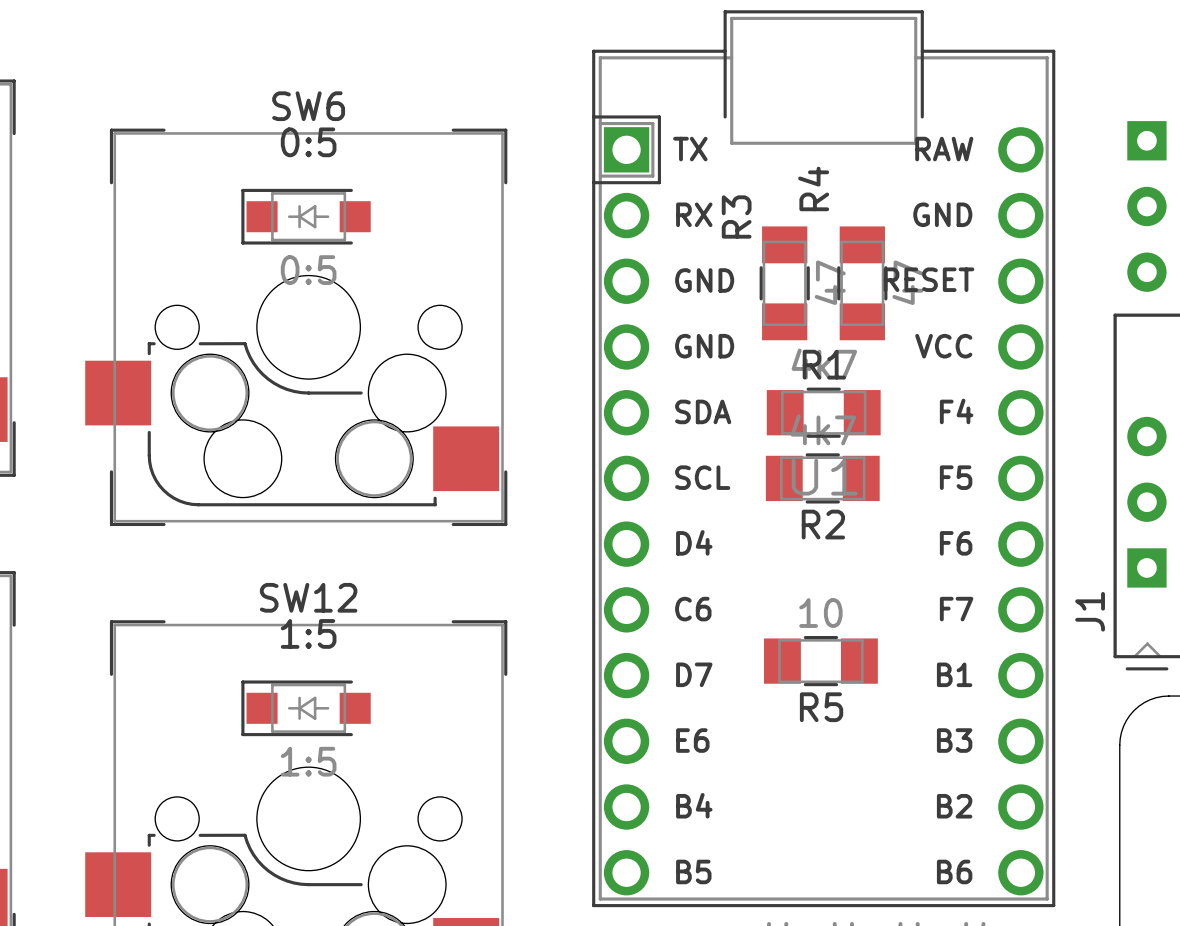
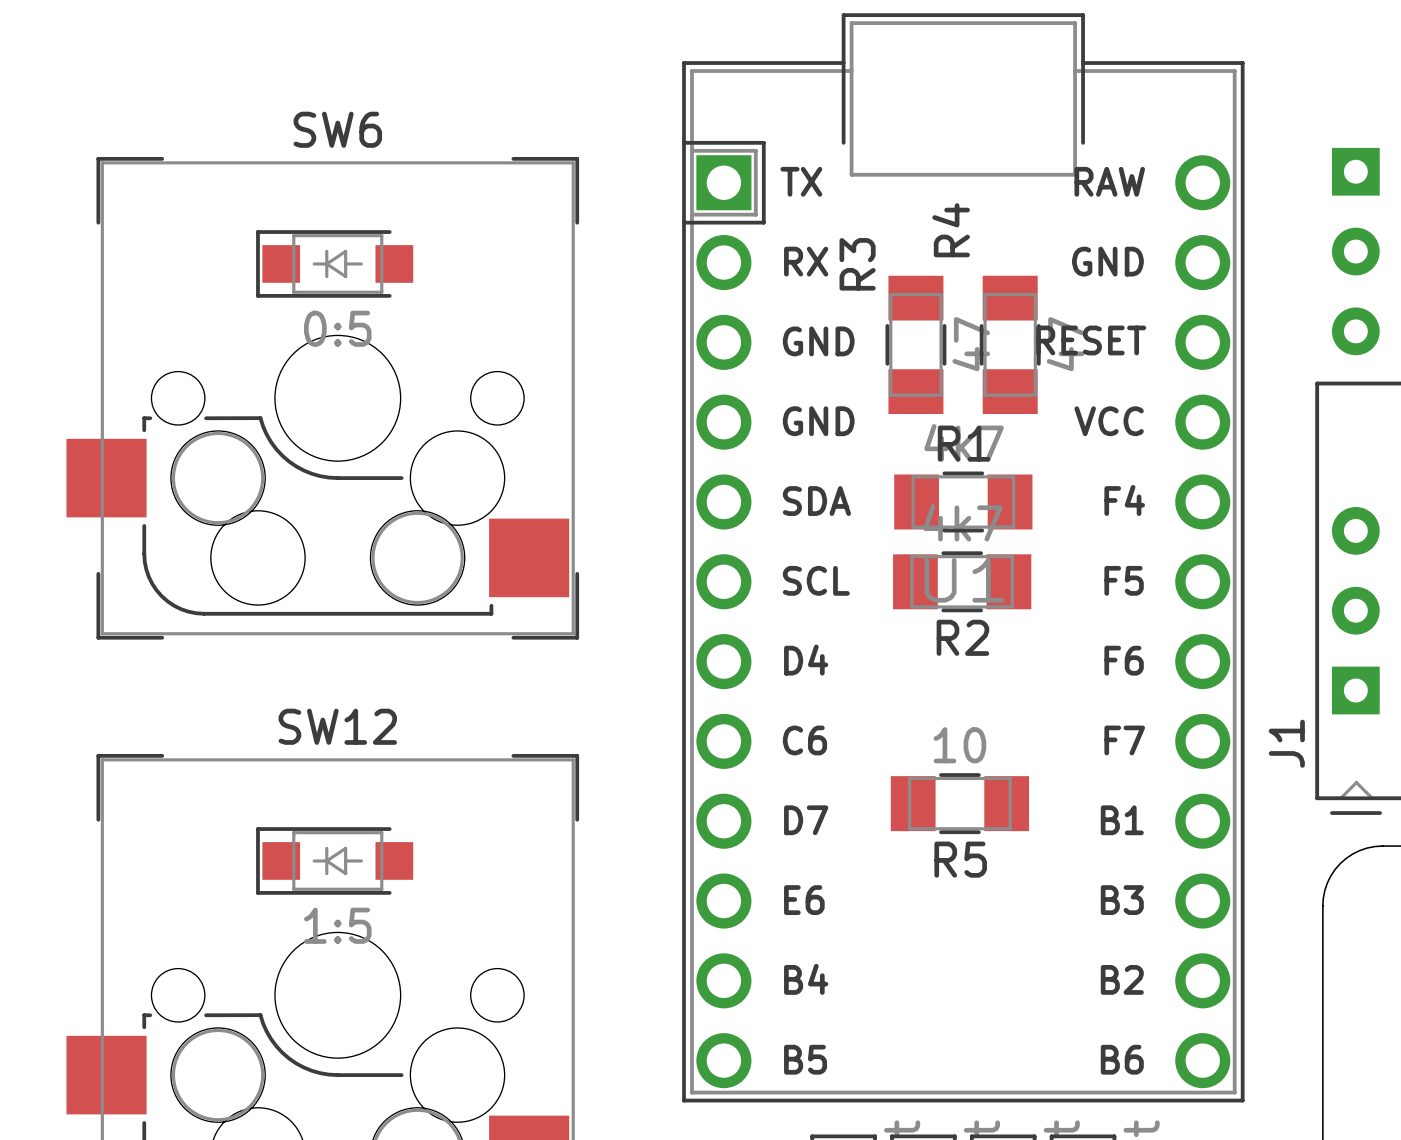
SW6 value: 0:5 (308, 142) -> none
SW12 value: 1:5 (308, 633) -> none

